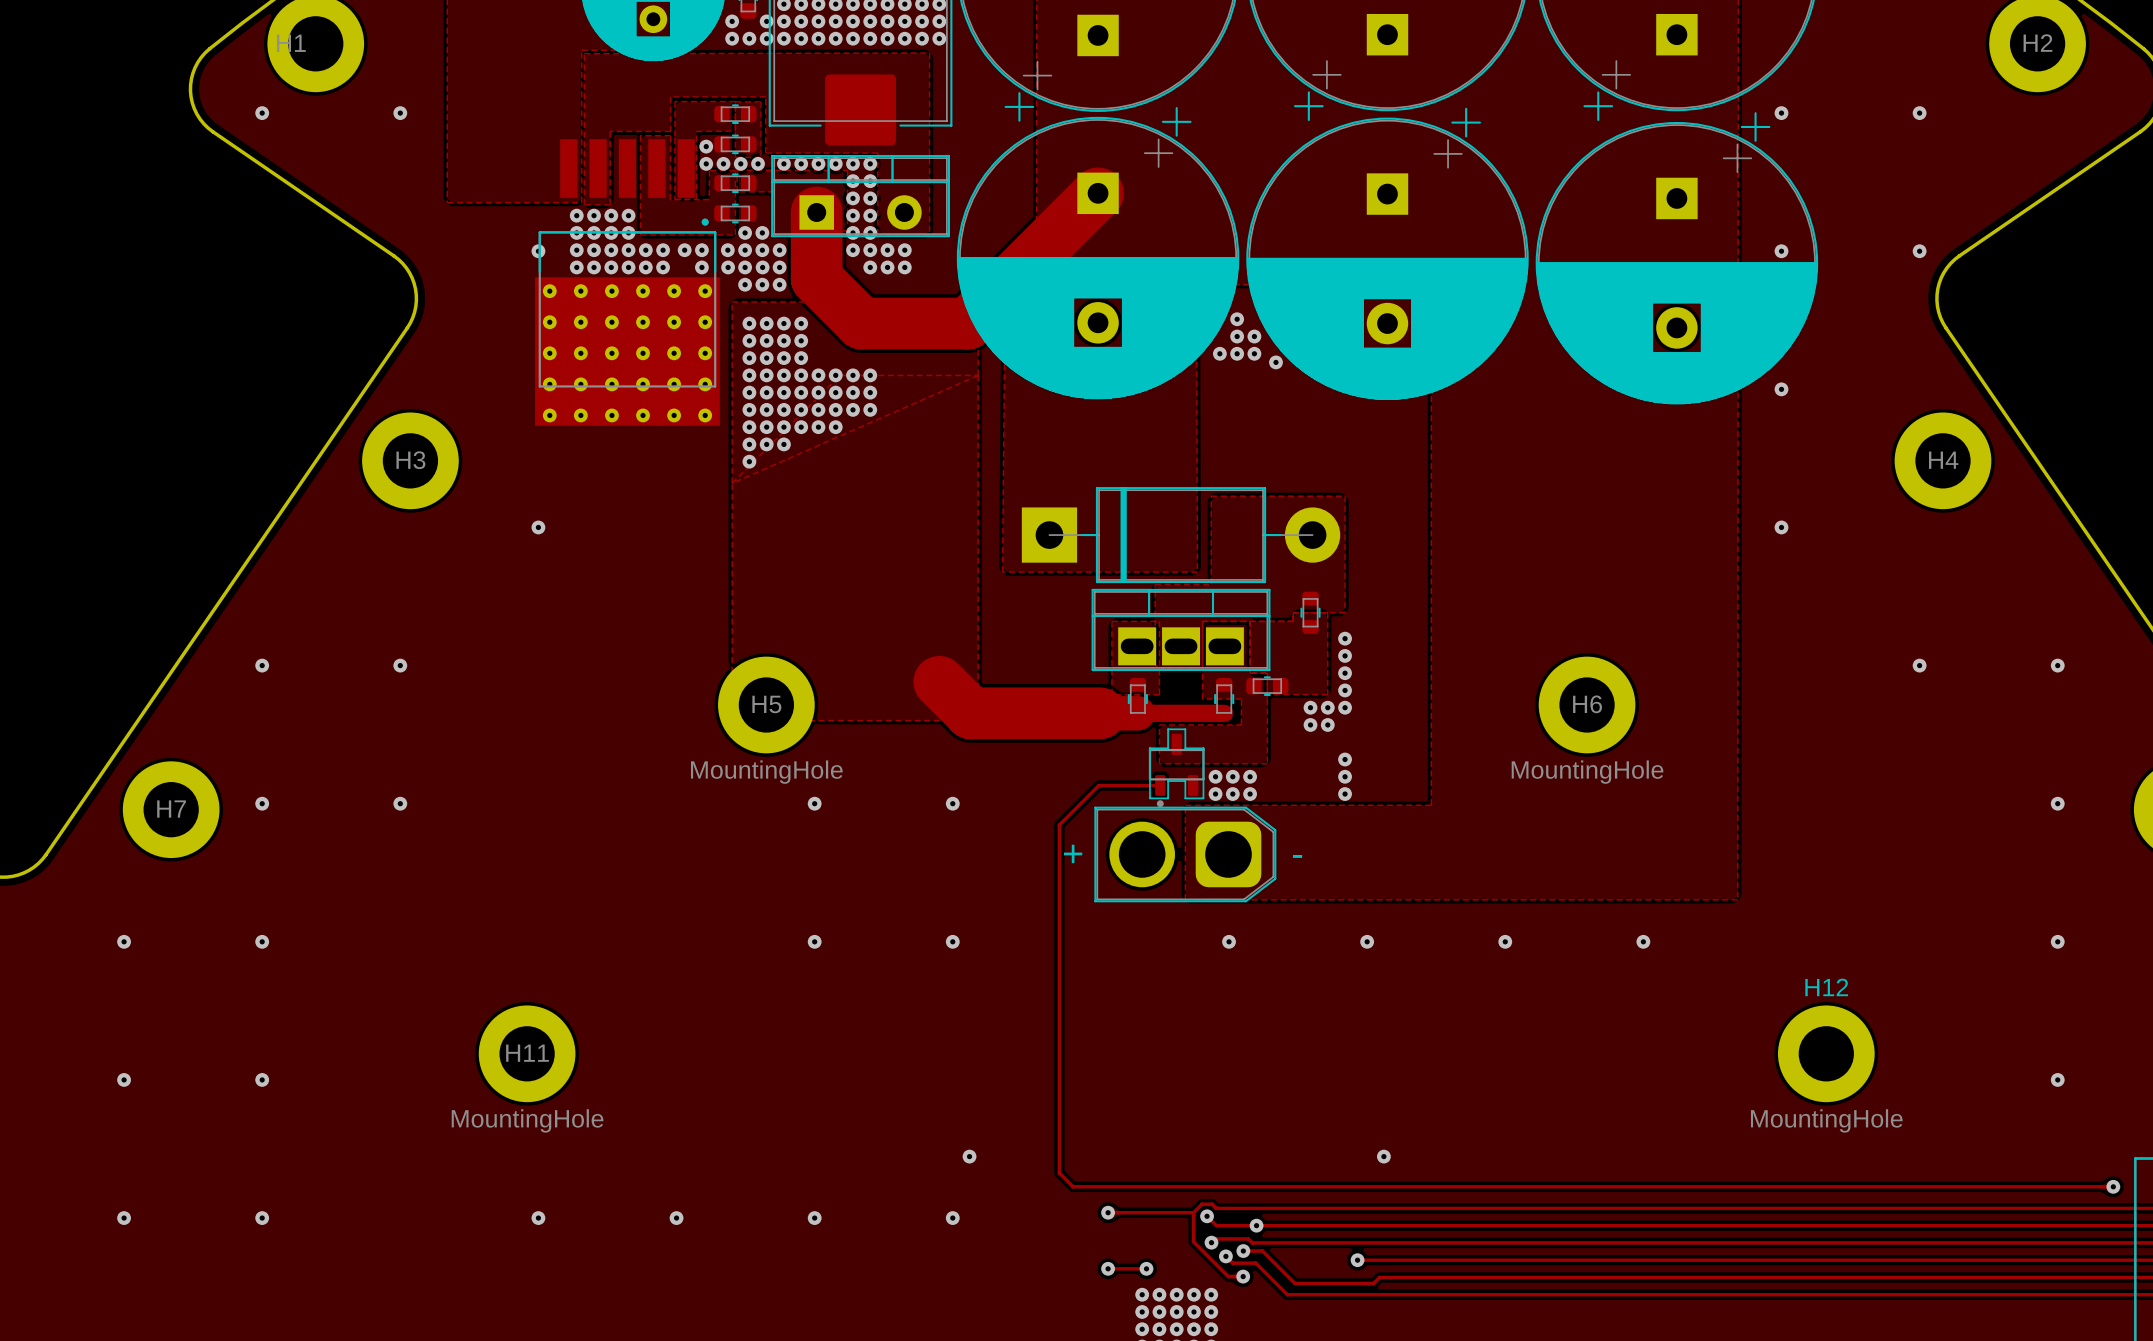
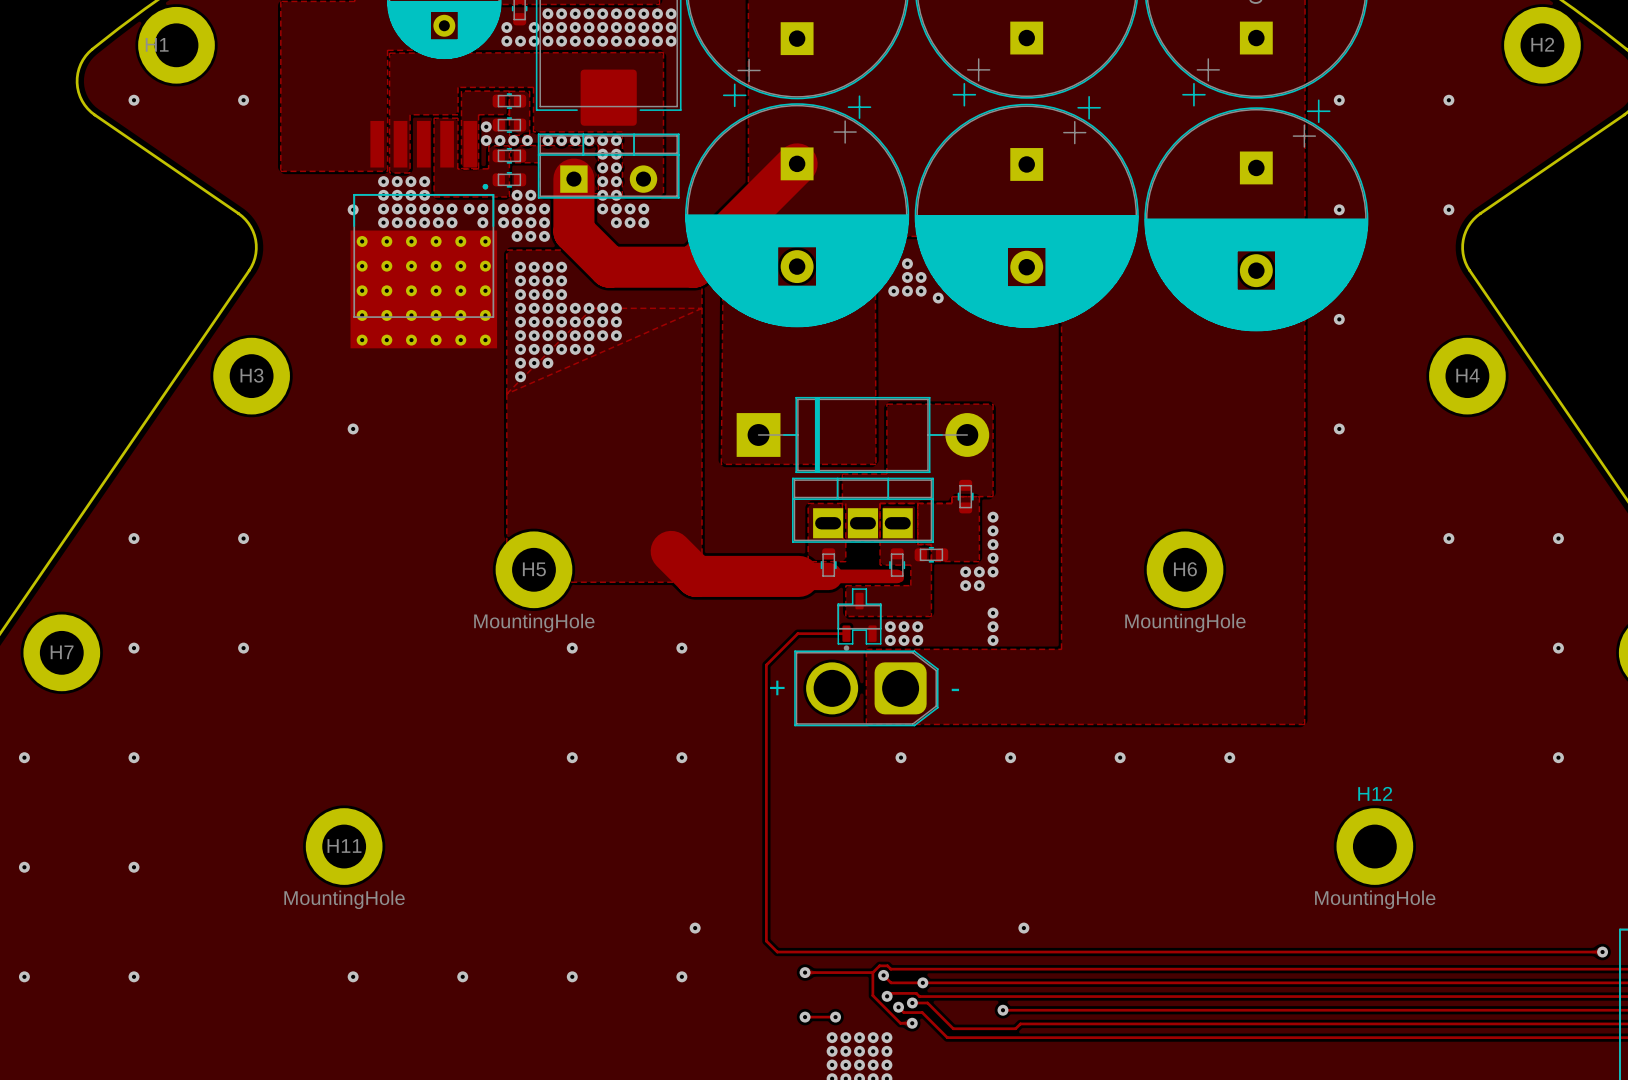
via: (2057, 1079) -> none

